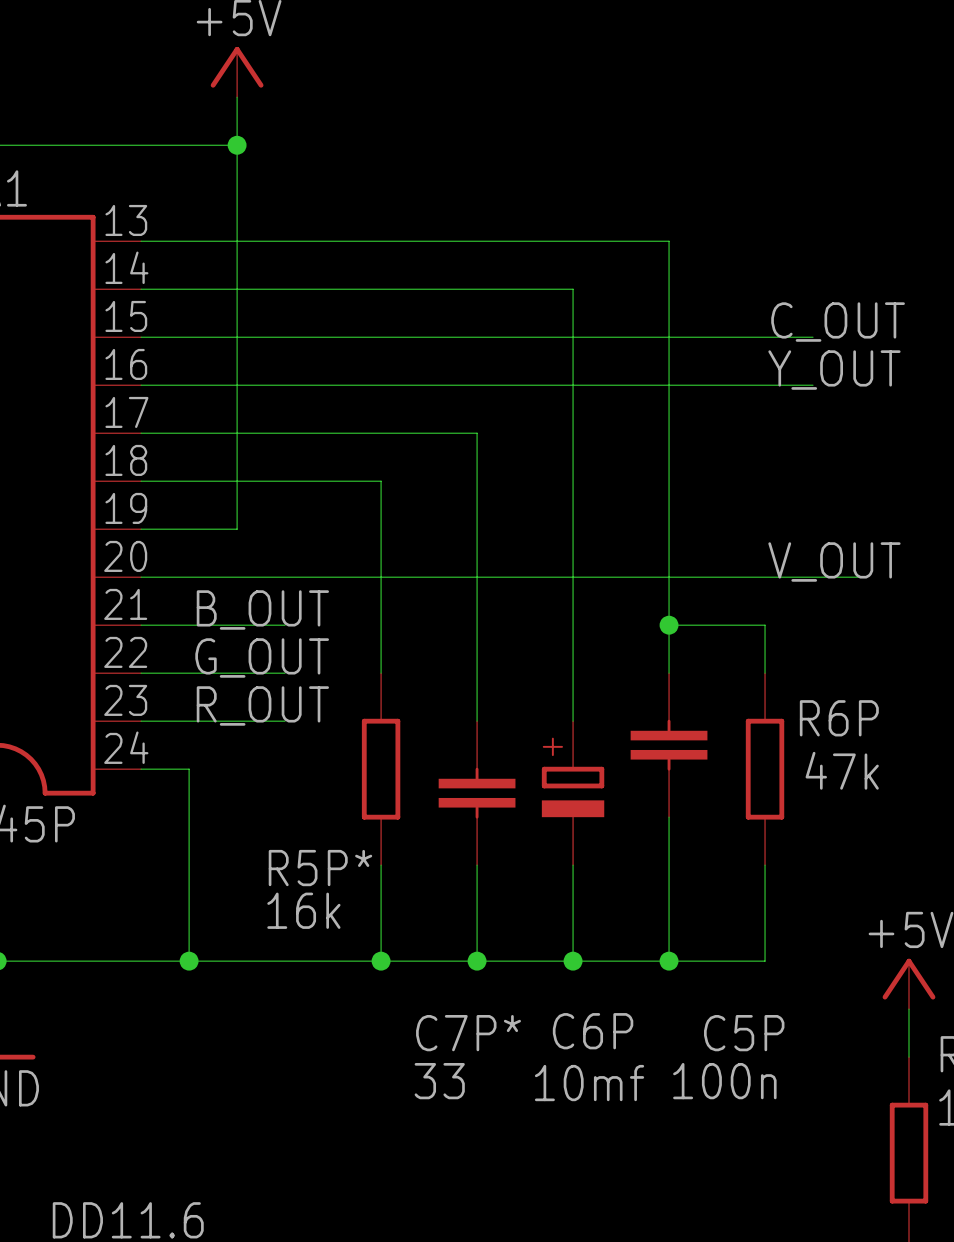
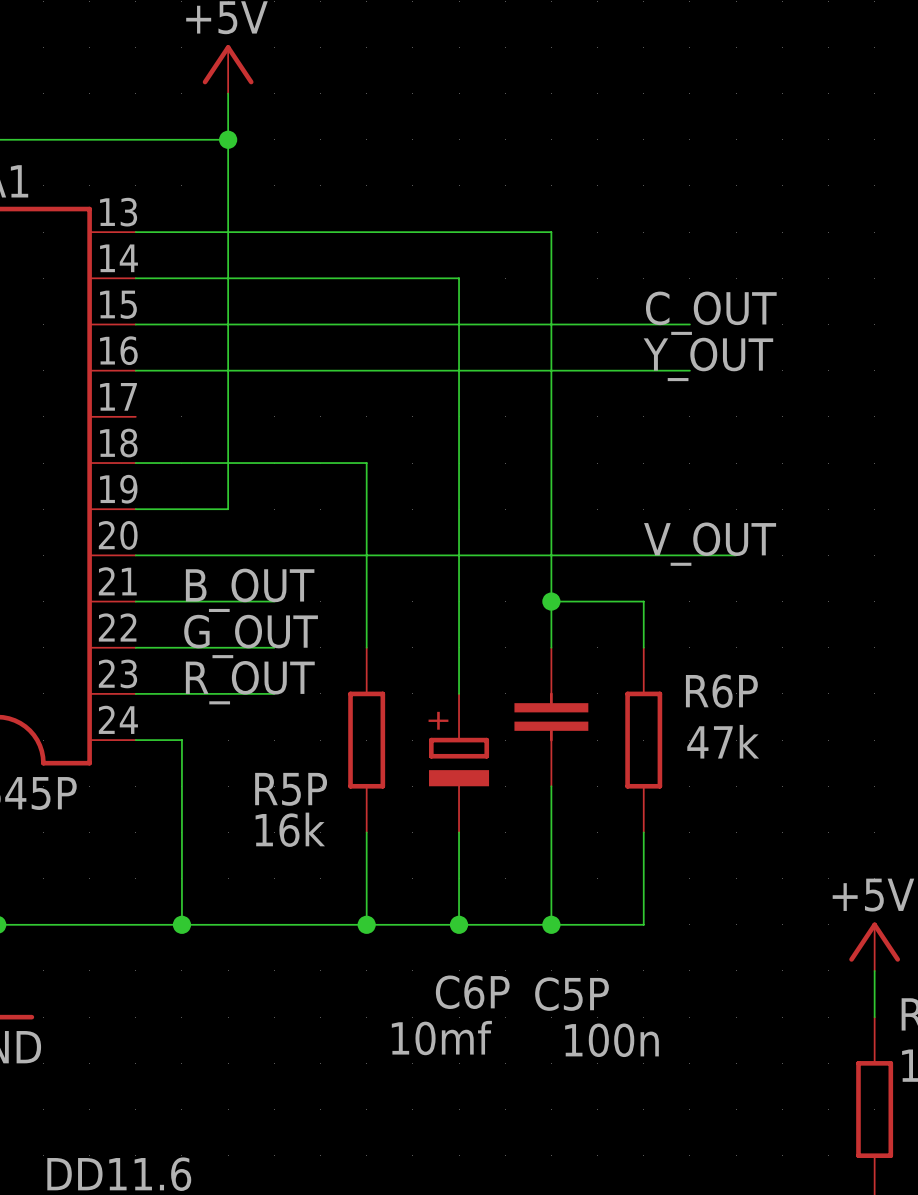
wire: (573, 241) (669, 241) (669, 625) (765, 625) (765, 673) -> none
wire: (477, 289) (573, 289) -> (551, 232) (551, 278)
label position: C_OUT (838, 322) -> C_OUT (711, 313)
wire: (717, 337) (813, 337) -> none
label position: Y_OUT (834, 370) -> Y_OUT (708, 359)
wire: (717, 385) (813, 385) -> none
wire: (141, 433) (477, 433) -> (459, 278) (459, 416)
label position: V_OUT (834, 562) -> V_OUT (710, 544)
wire: (765, 577) (861, 577) -> (551, 601) (643, 601)
junction position: (669, 625) -> (551, 601)
C5P position: (669, 745) -> (551, 717)
R6P position: (765, 769) -> (643, 740)
C7P*: 33 (477, 793) -> none
C6P position: (573, 793) -> (459, 763)
wire: (765, 865) (765, 961) (669, 961) -> none
R5P* name: R5P* (320, 868) -> R5P (291, 789)
R5P* value position: 16k (303, 910) -> 16k (290, 829)
junction: (669, 961) -> none
C5P name position: C5P (744, 1033) -> C5P (572, 994)
C6P value position: 10mf (589, 1083) -> 10mf (441, 1038)

